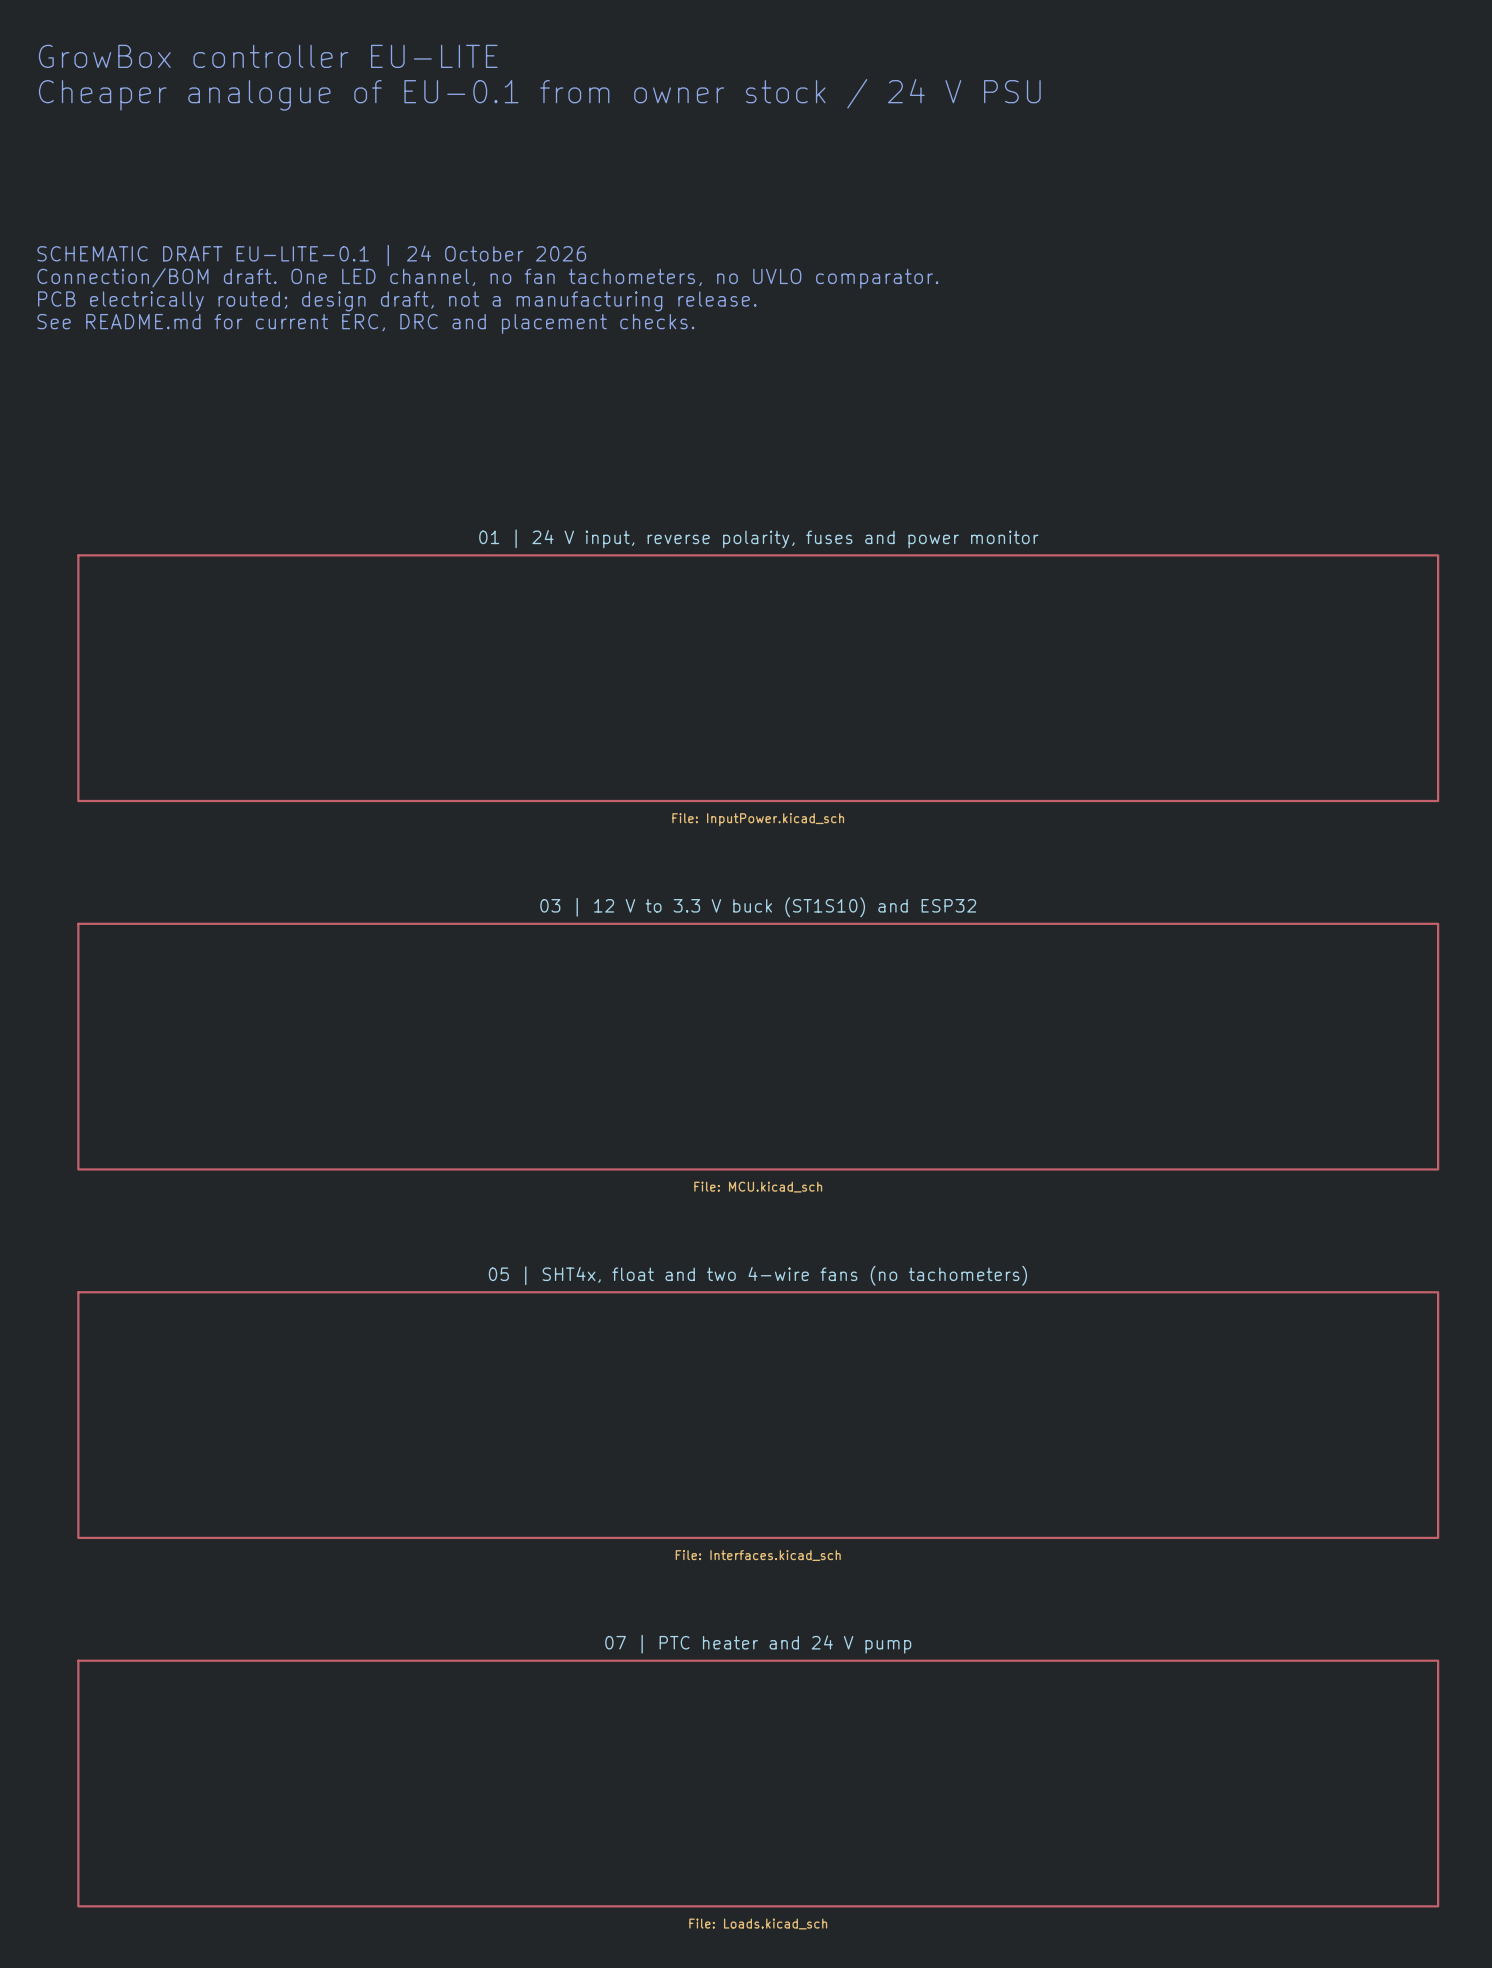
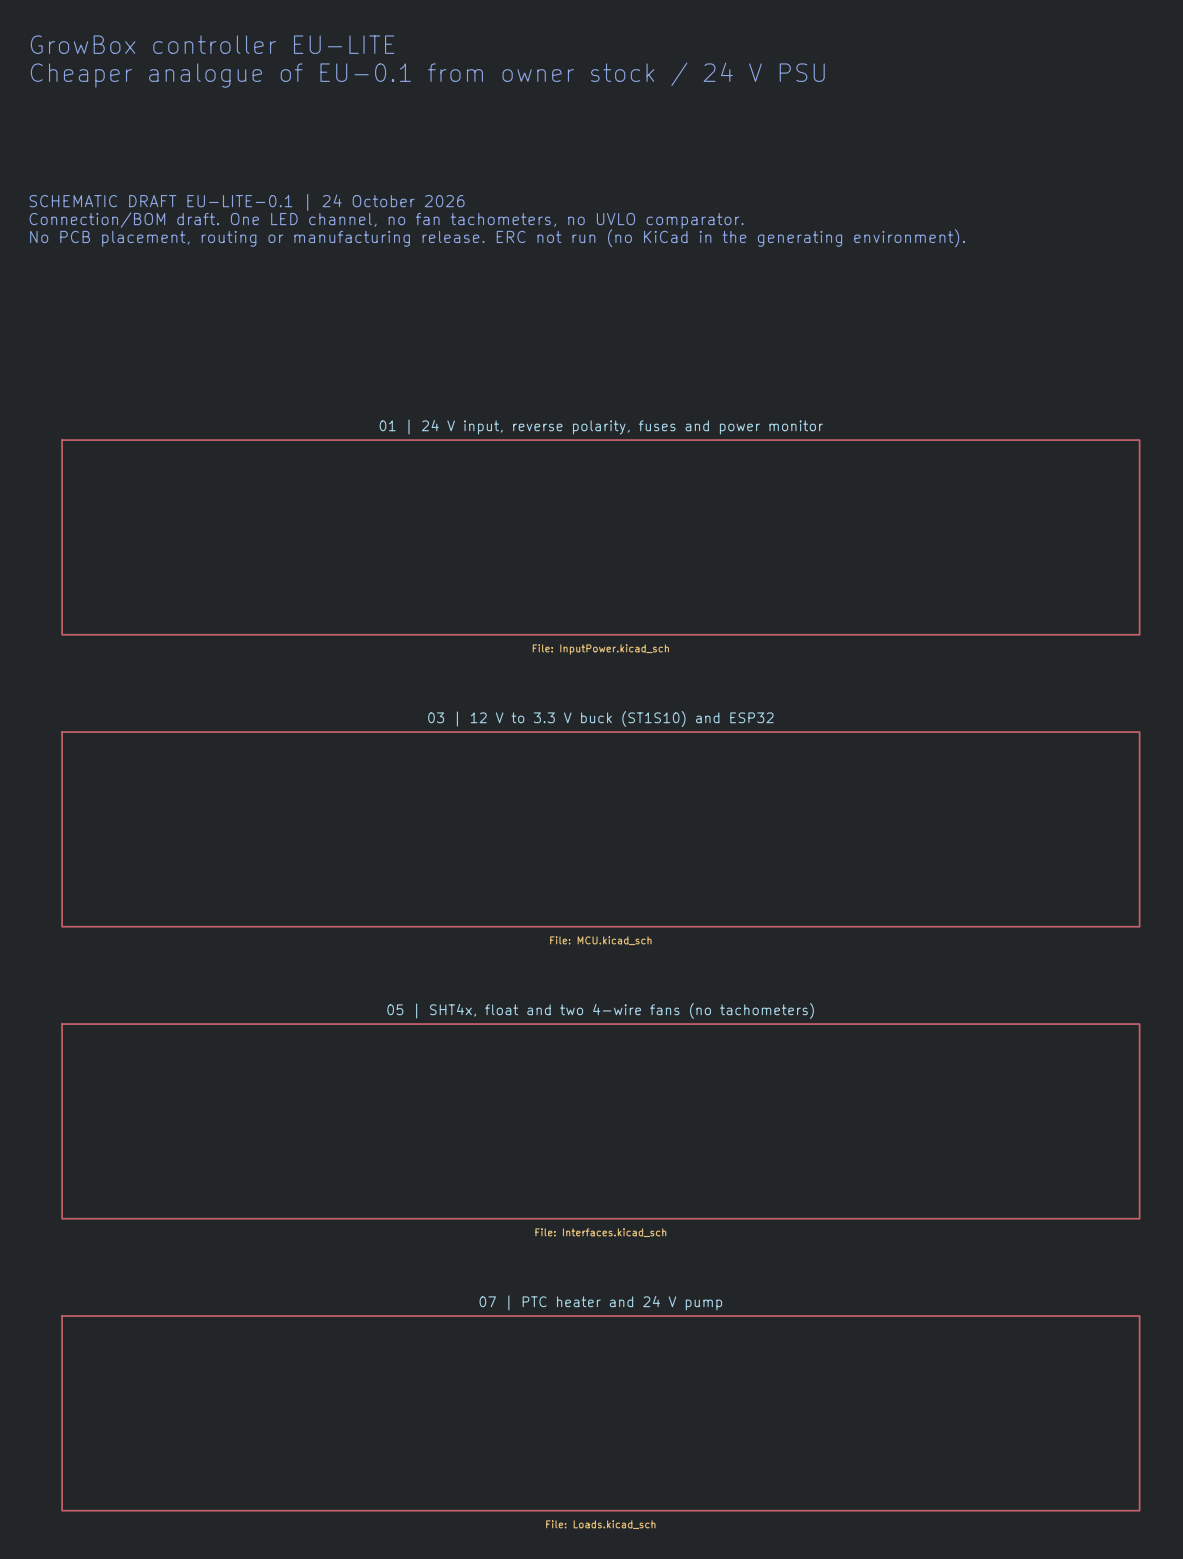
text: PCB electrically routed; design draft, not a manufacturing release. (397, 301) -> No PCB placement, routing or manufacturing release. ERC not run (no KiCad in the generating environment). (497, 238)
text: See README.md for current ERC, DRC and placement checks. (365, 323) -> none

